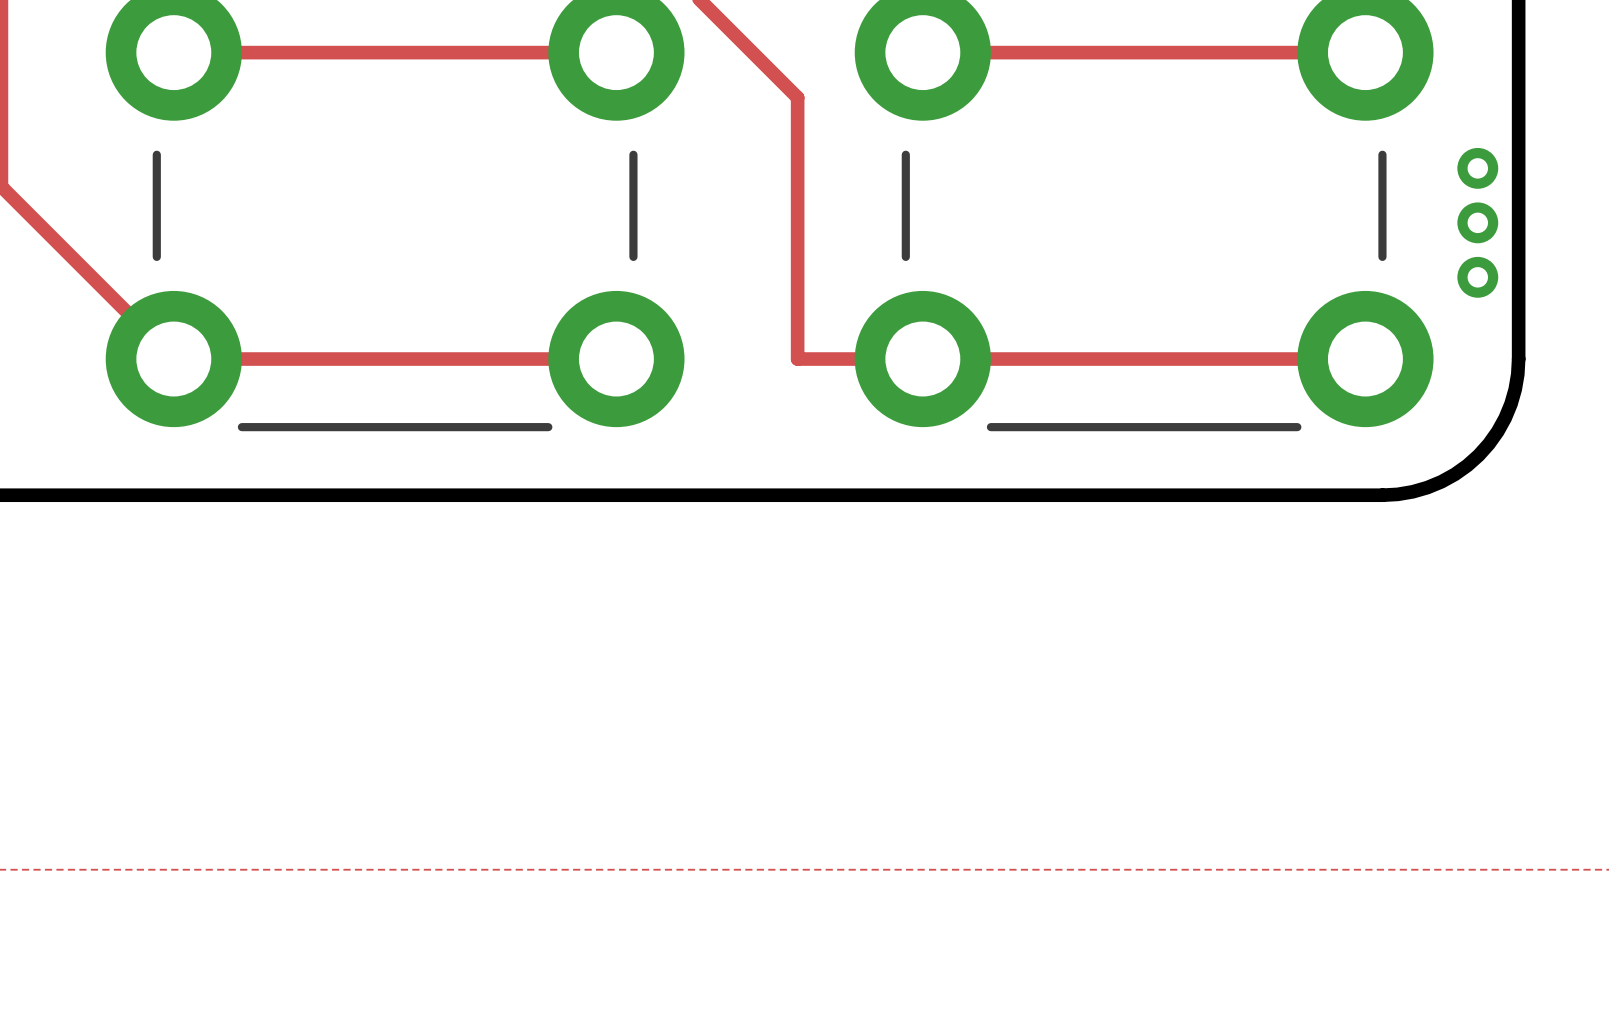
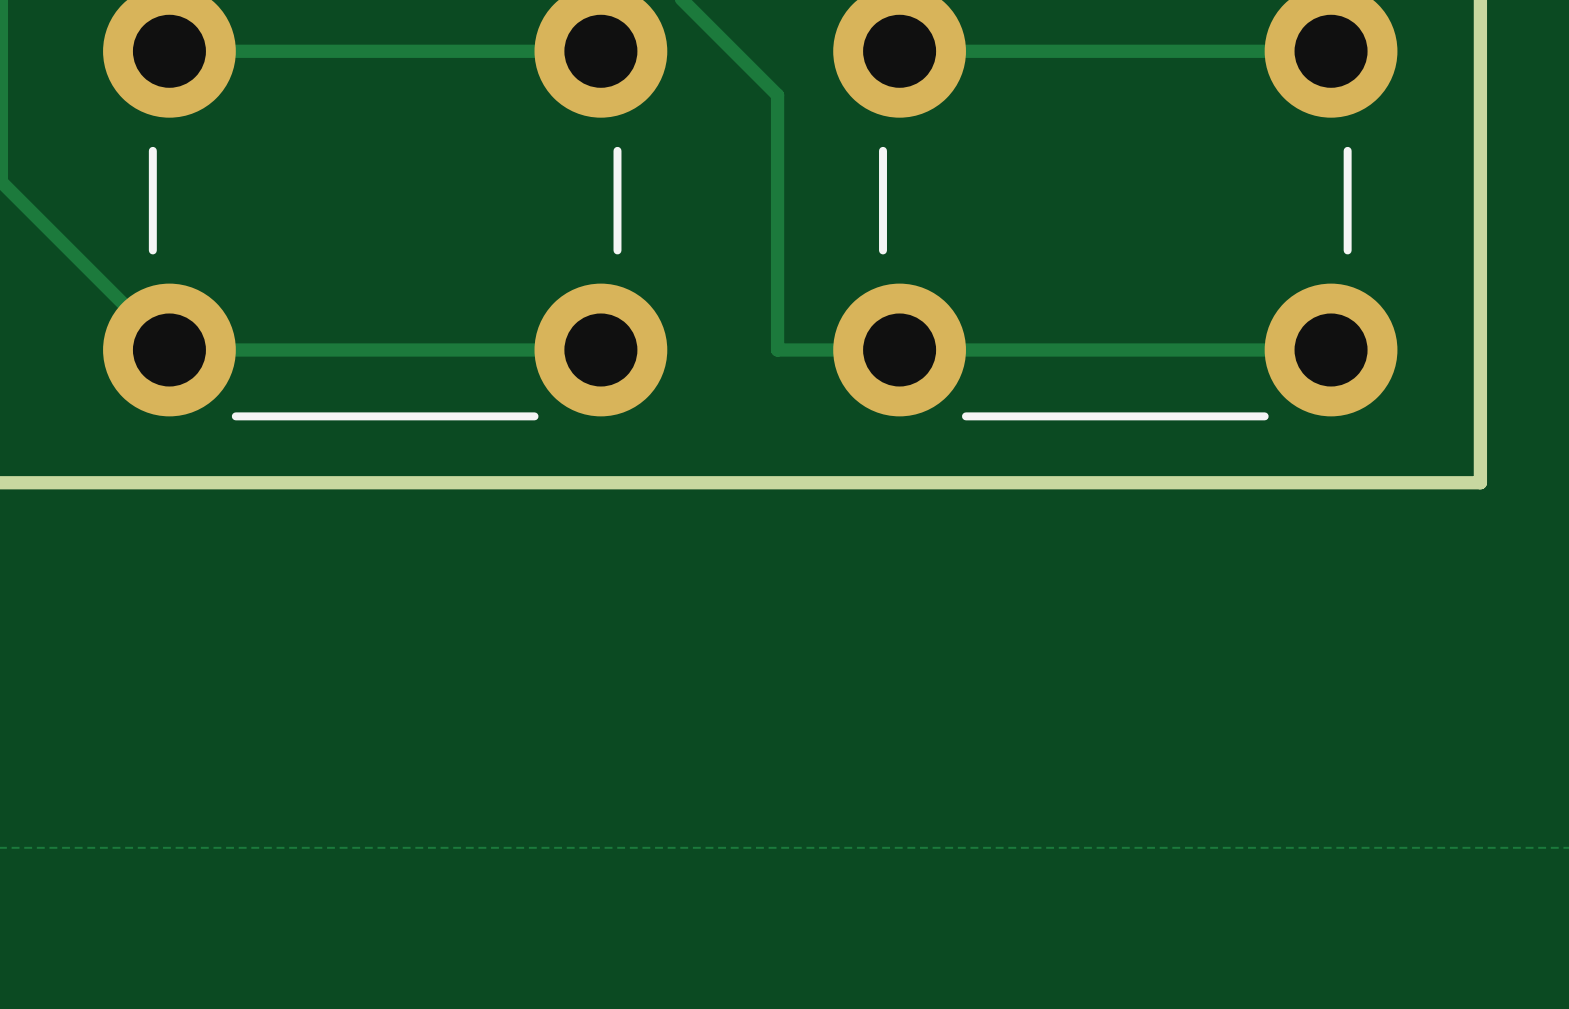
via: (1477, 168) -> none
via: (1477, 222) -> none
via: (1477, 277) -> none
board edge: (1518, 359) (1515, 389) (1505, 418) (1488, 443) (1478, 455) (1454, 474) (1441, 481) (1412, 491) (1382, 495) -> (1480, 349) (1480, 482) (1347, 482)

